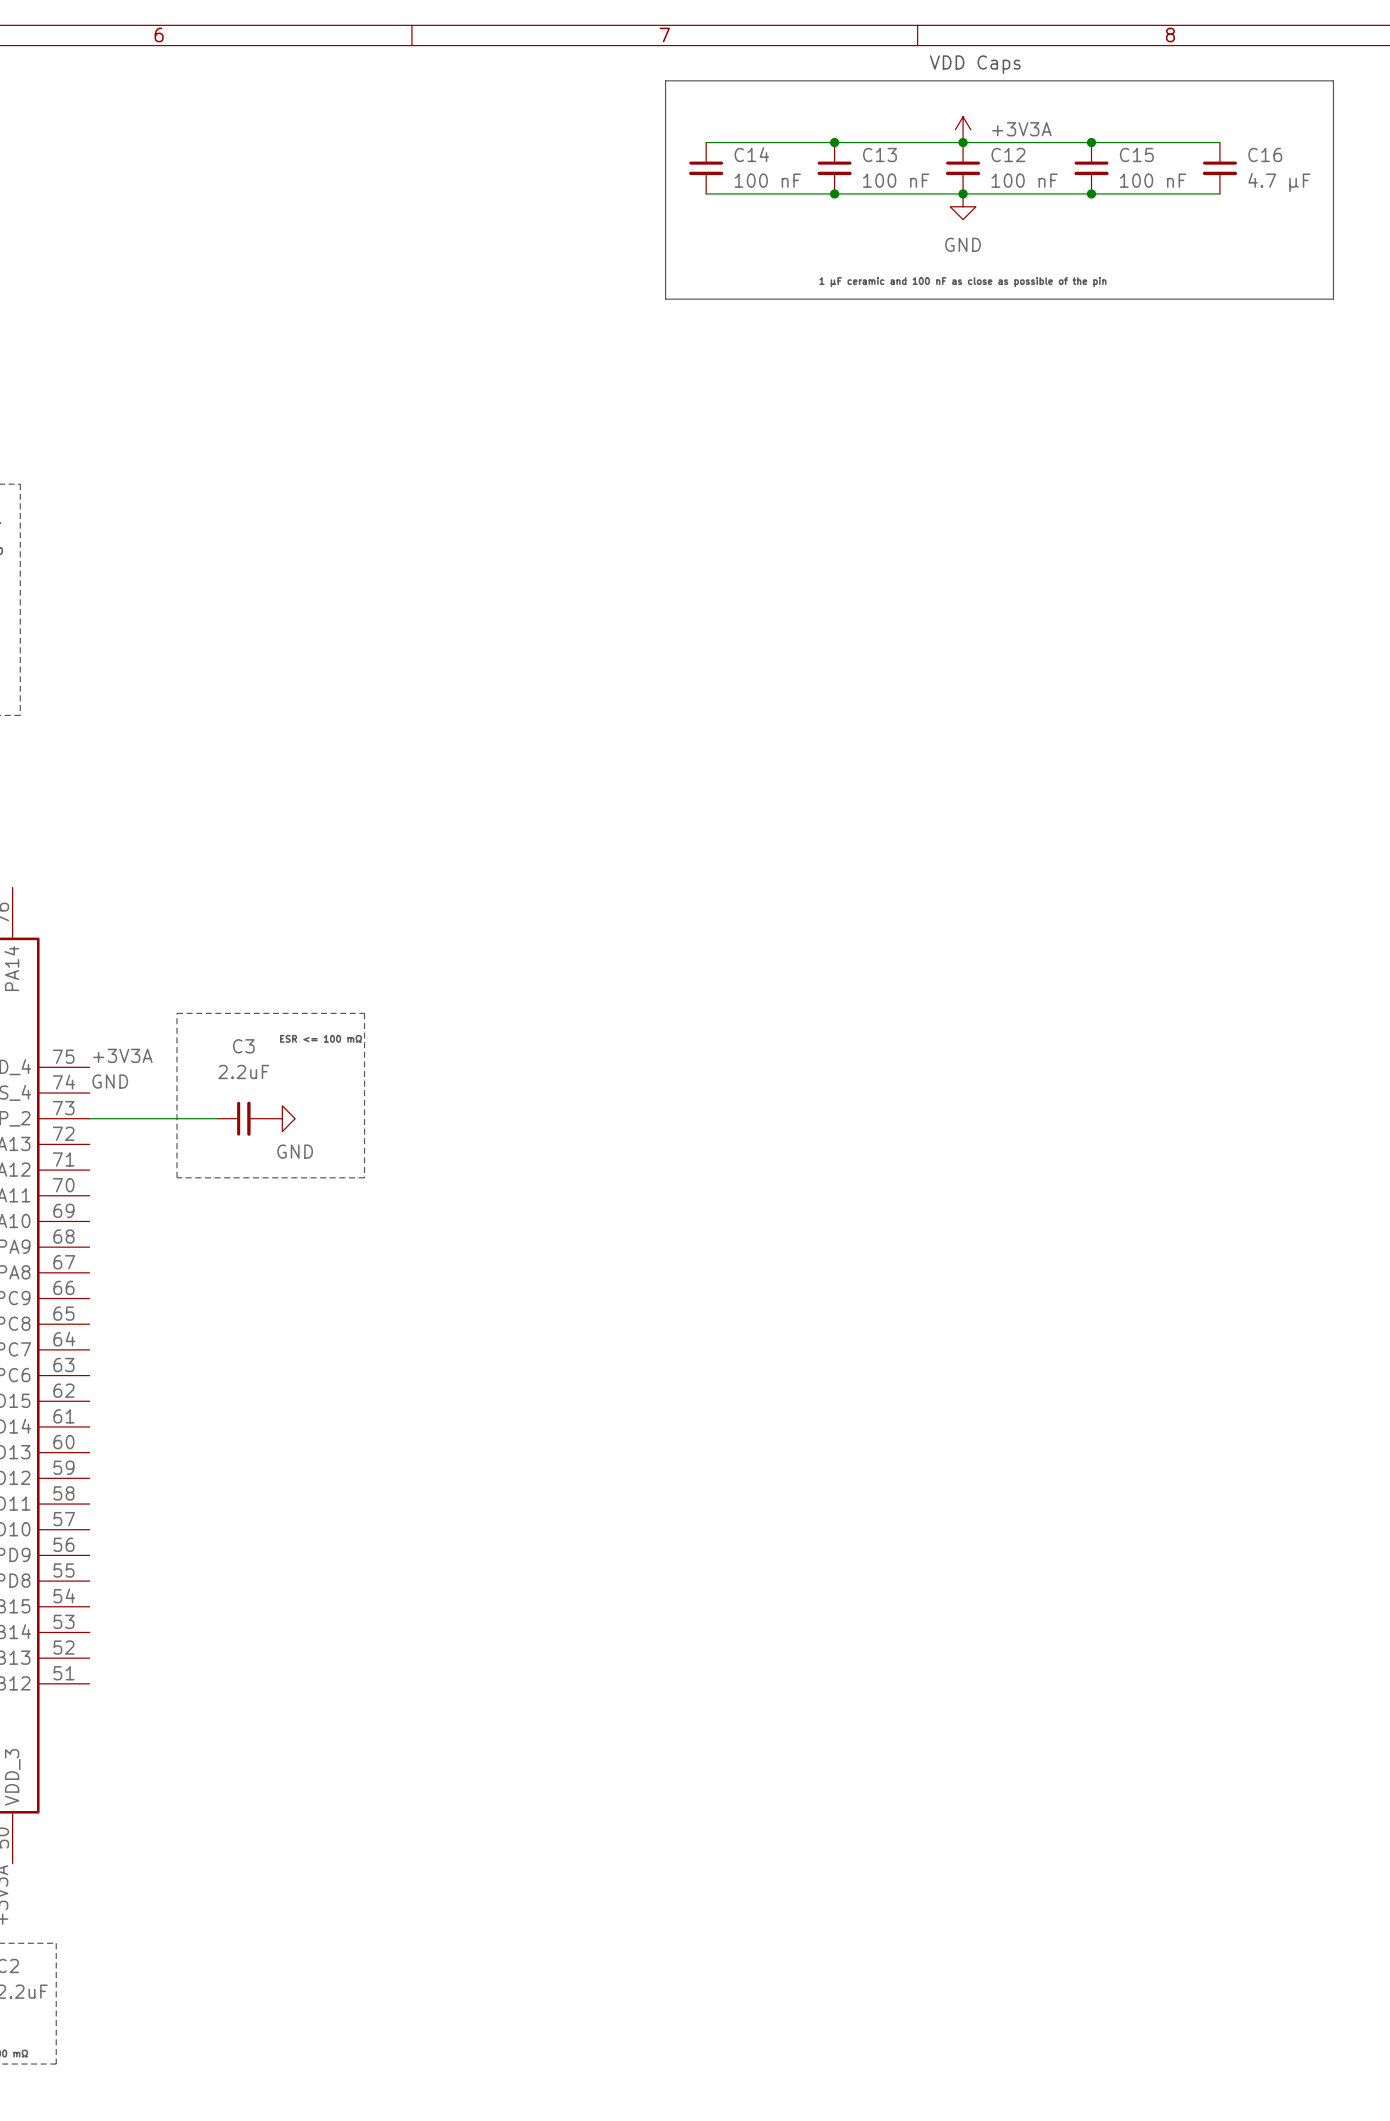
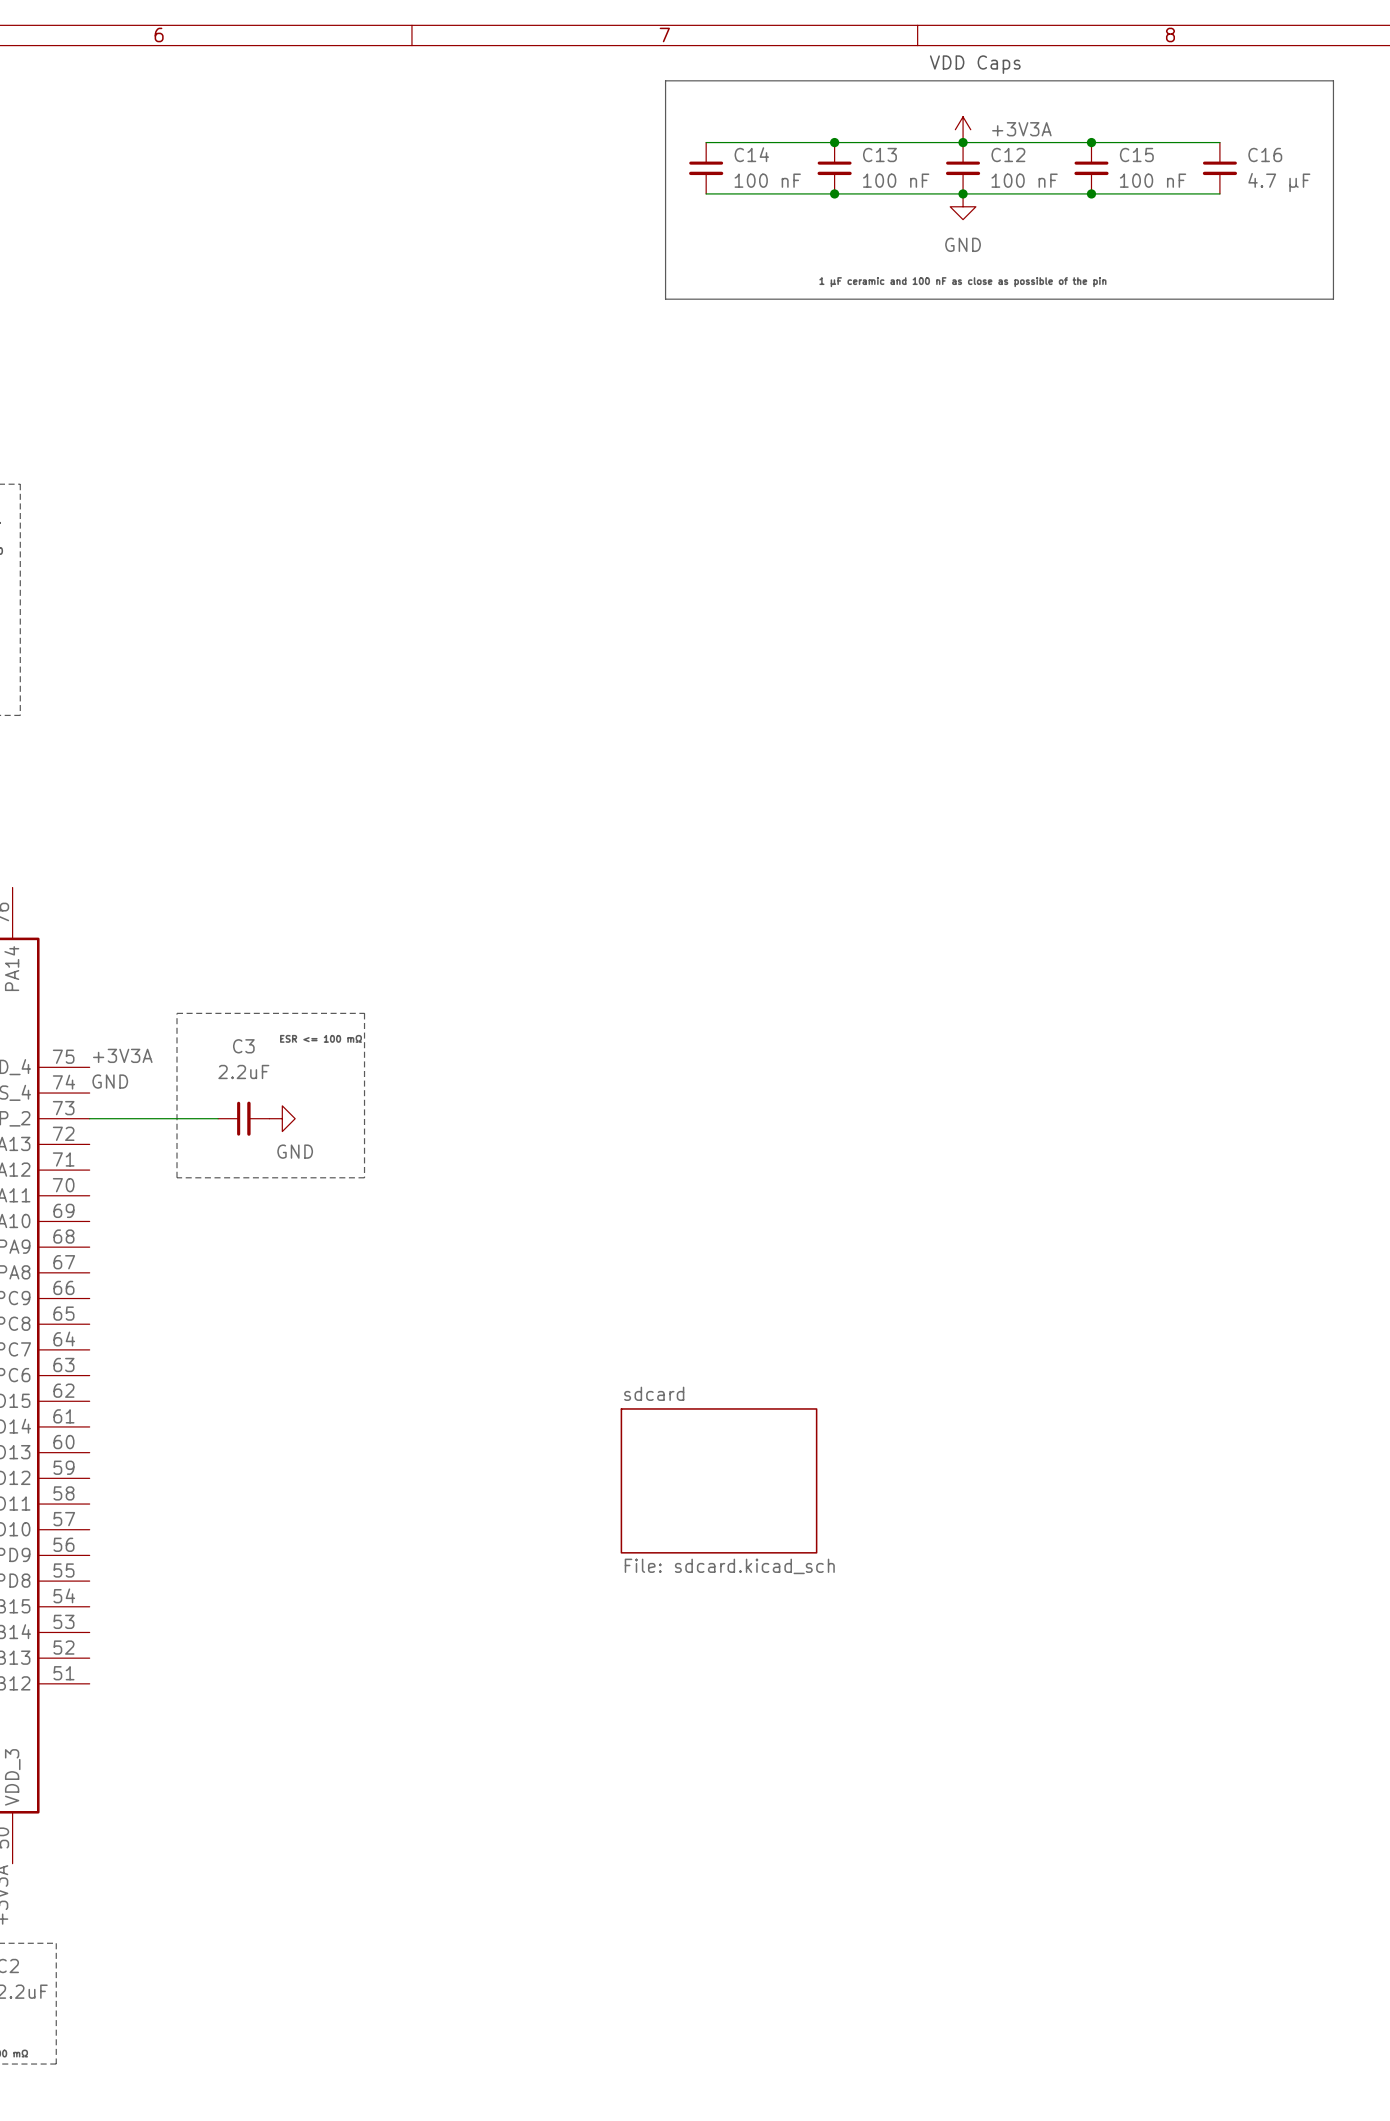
sheet sdcard: none -> File: sdcard.kicad_sch (719, 1480)

